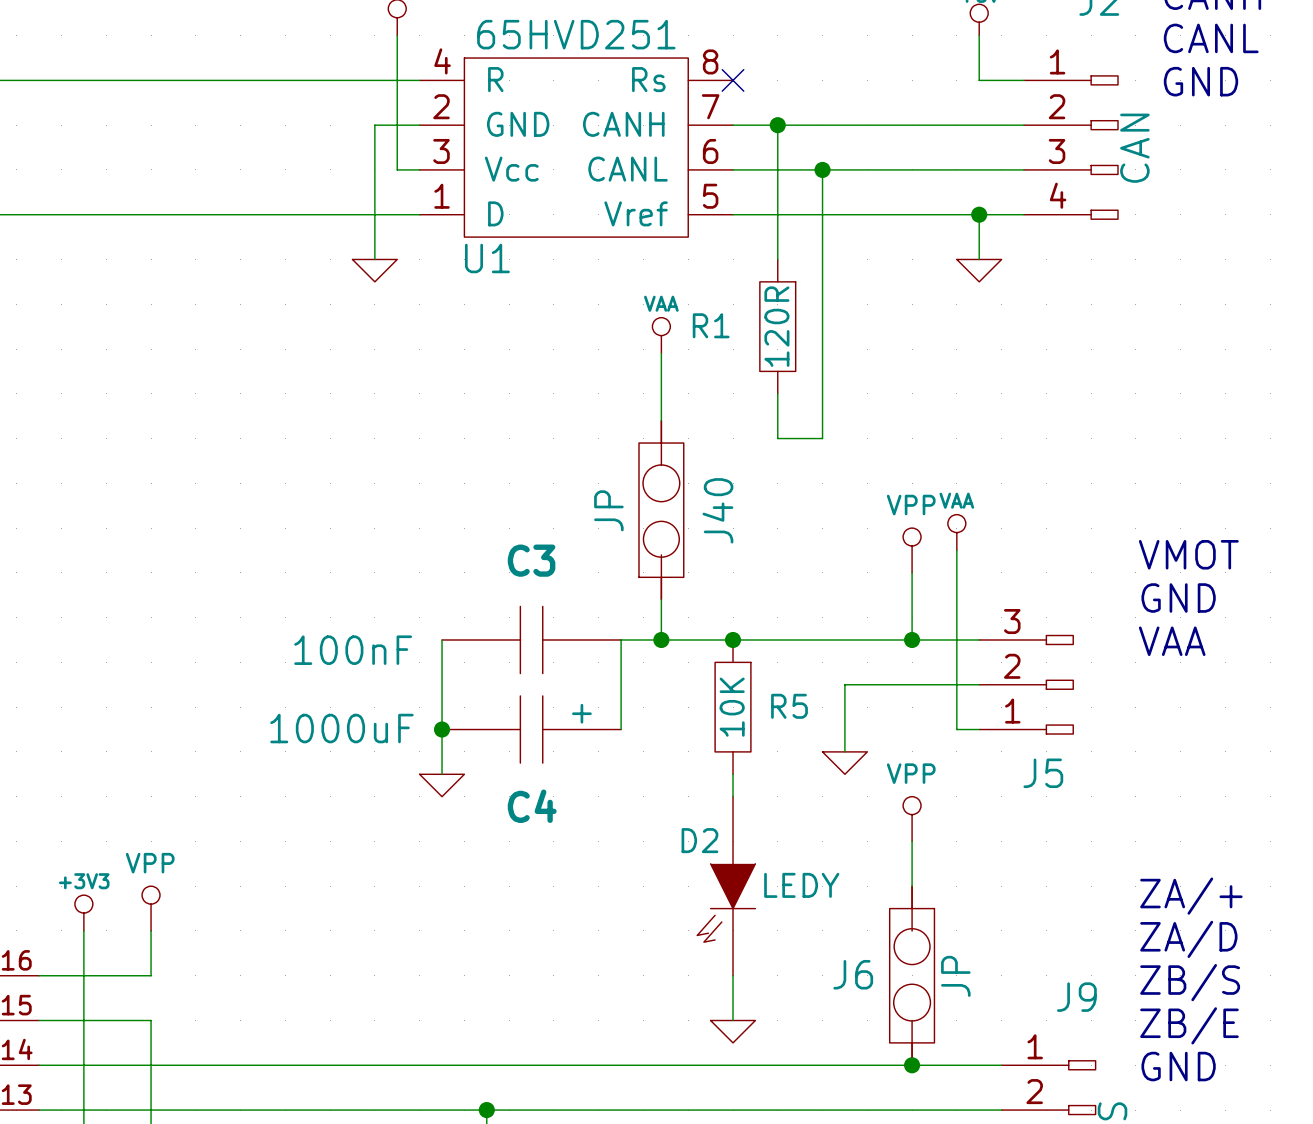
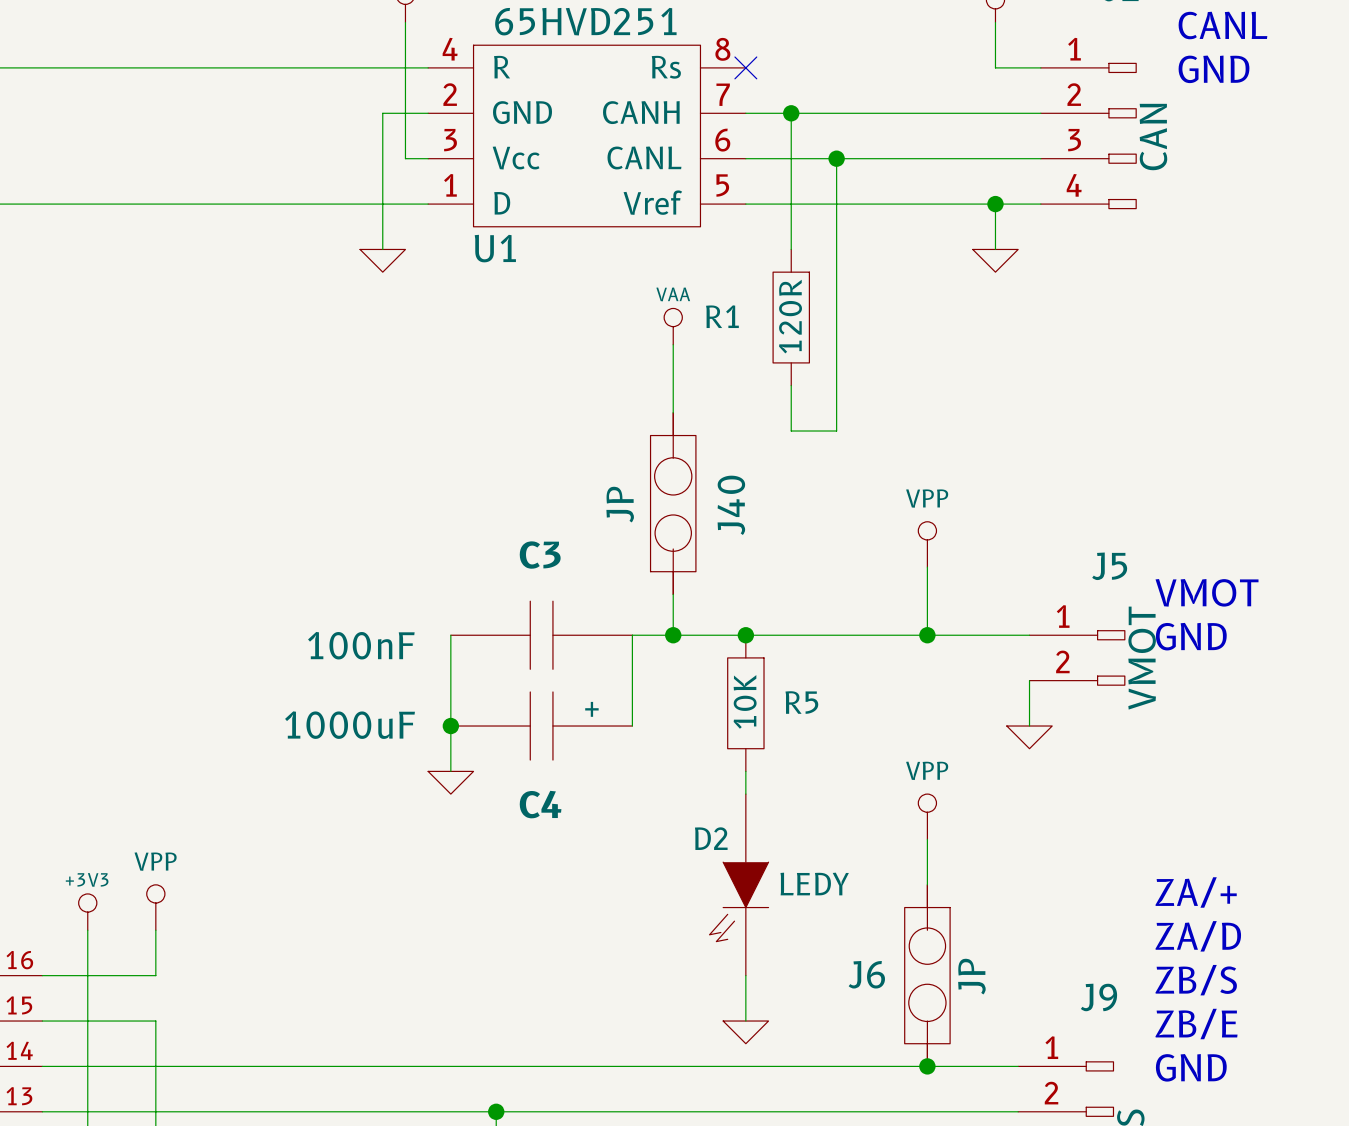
power symbol: VAA (956, 532) -> none
wire: (956, 550) (956, 729) (979, 729) -> none
text: VMOT (1188, 554) -> none
text: GND (1178, 598) -> VMOT (1207, 592)
J5 symbol: [979, 635, 1074, 735] -> [1029, 630, 1125, 686]
text: VAA (1172, 641) -> GND (1191, 636)
J5 value: none -> VMOT (1142, 658)
wire: (979, 684) (844, 684) (844, 751) -> none
wire: none -> (1029, 680) (1029, 726)
power symbol position: (844, 763) -> (1029, 737)
J5 name position: J5 (1043, 773) -> J5 (1109, 566)

